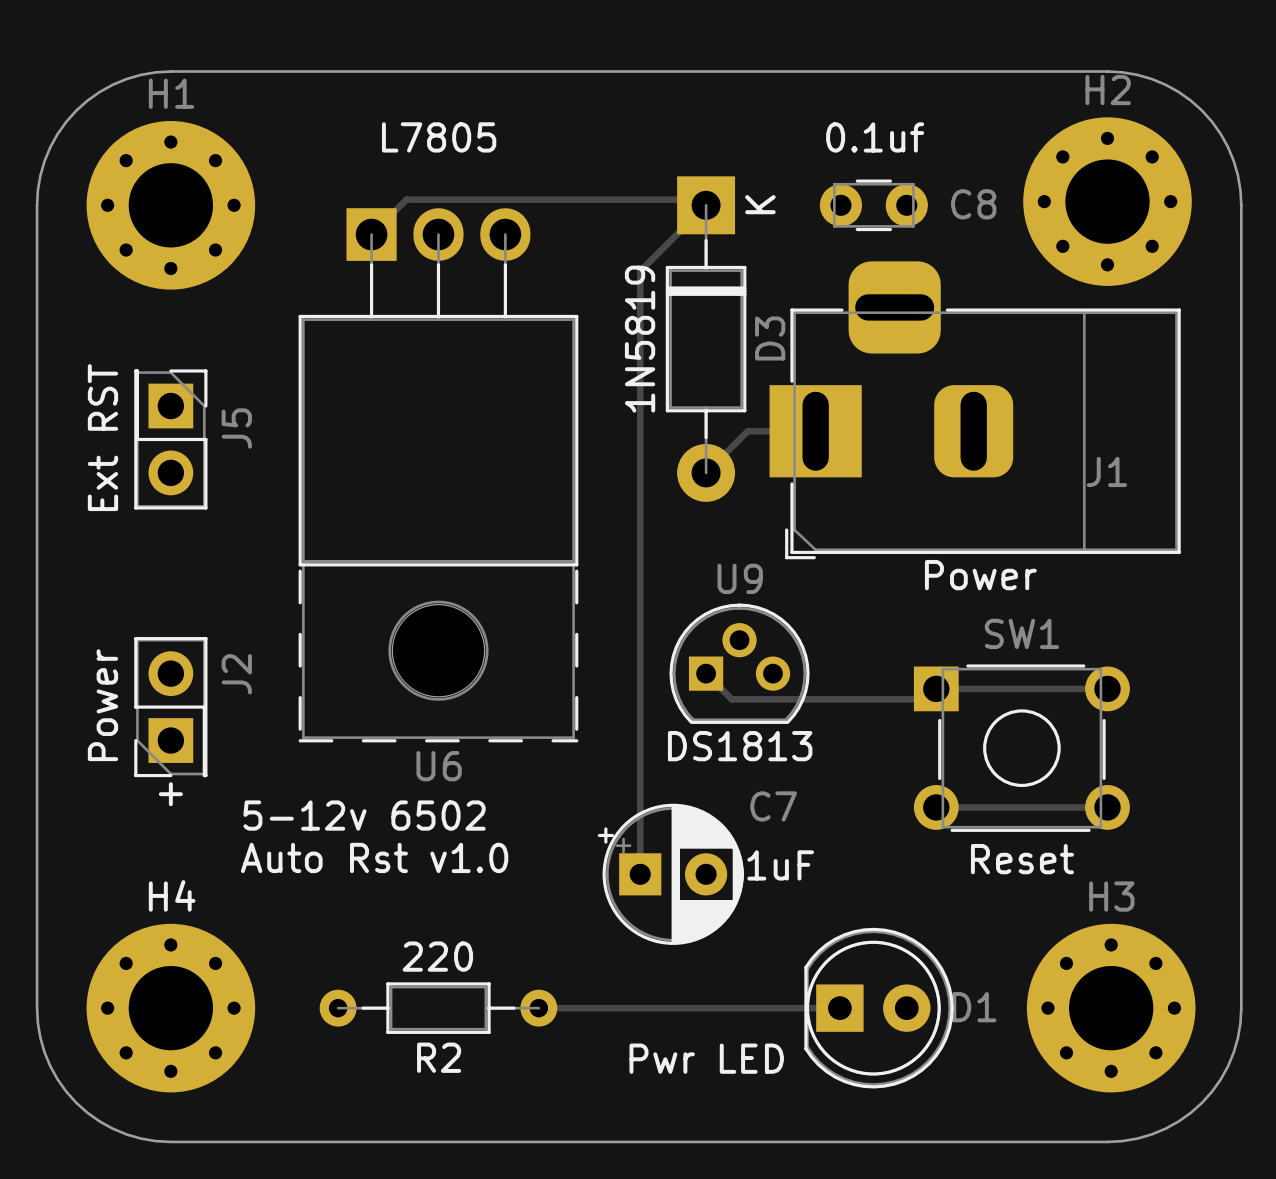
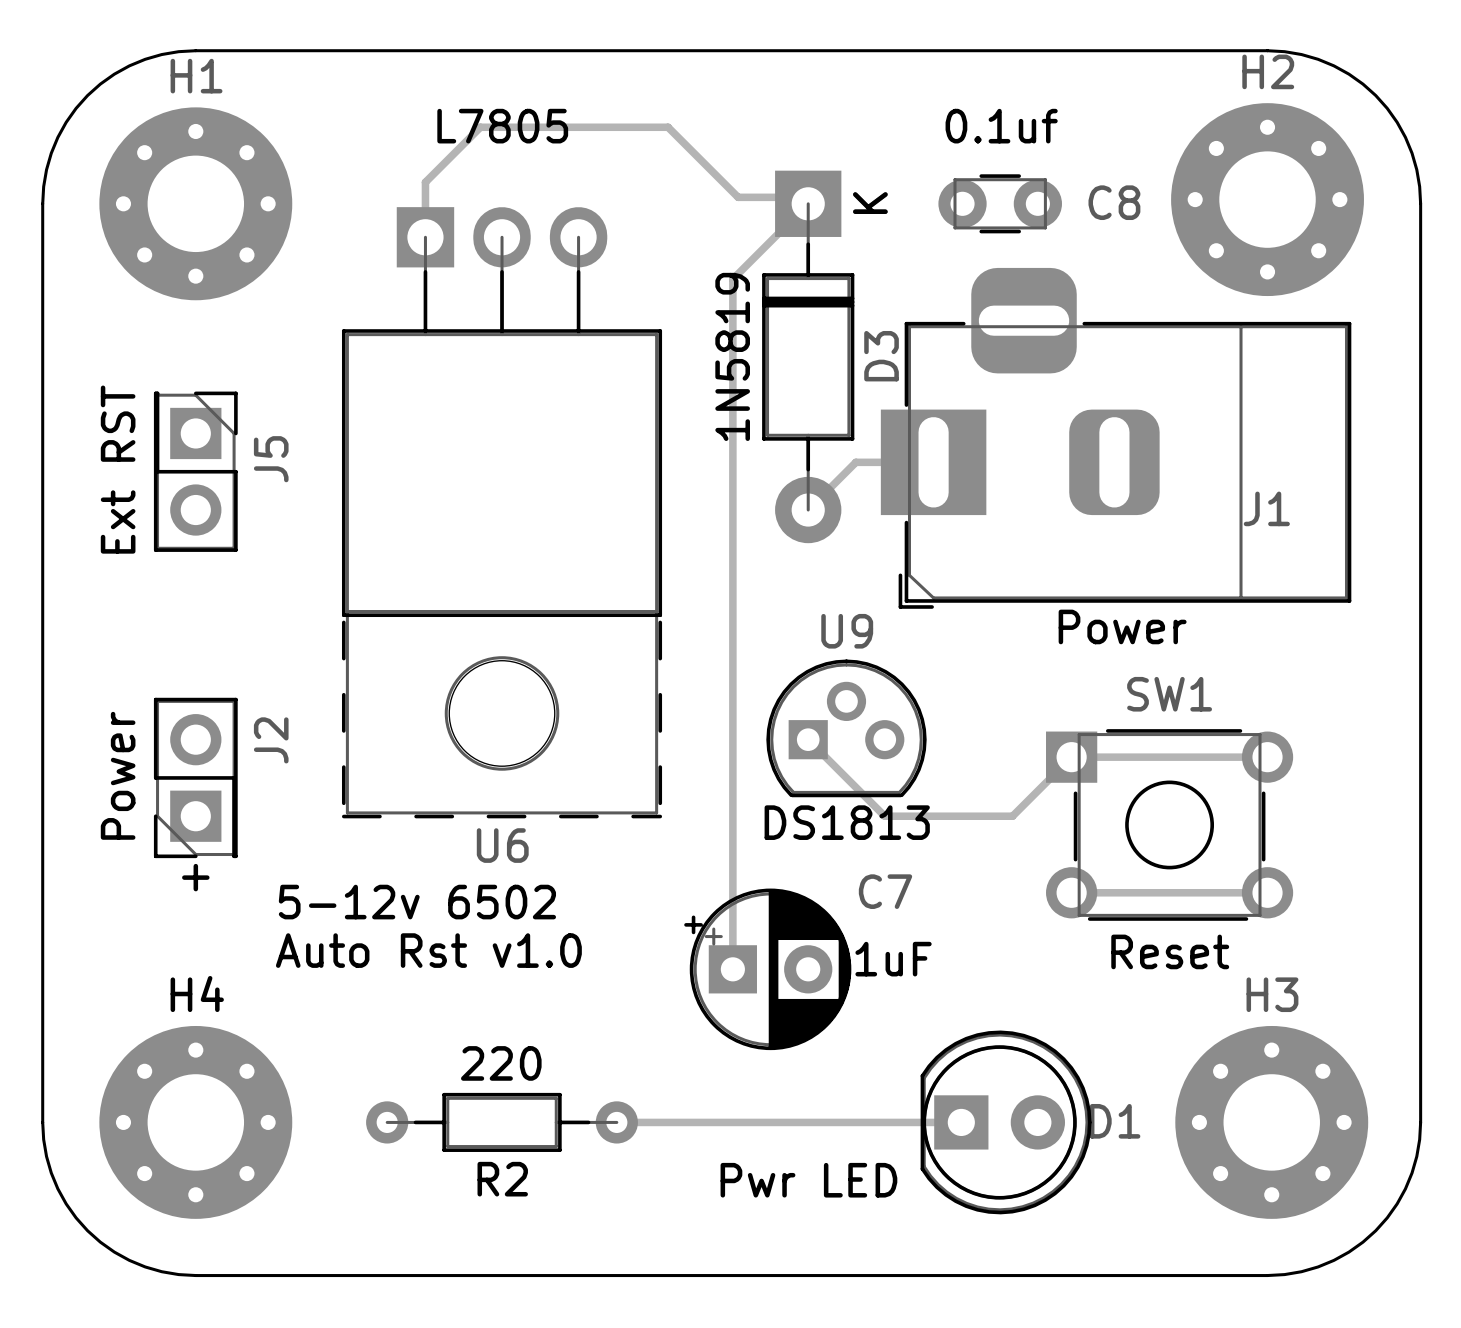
track: (644, 199) (406, 199) (371, 234) -> (738, 197) (668, 127) (480, 127) (425, 182) (425, 237)
track: (731, 699) (925, 699) -> (837, 769) (884, 816) (1012, 816) (1059, 769)

